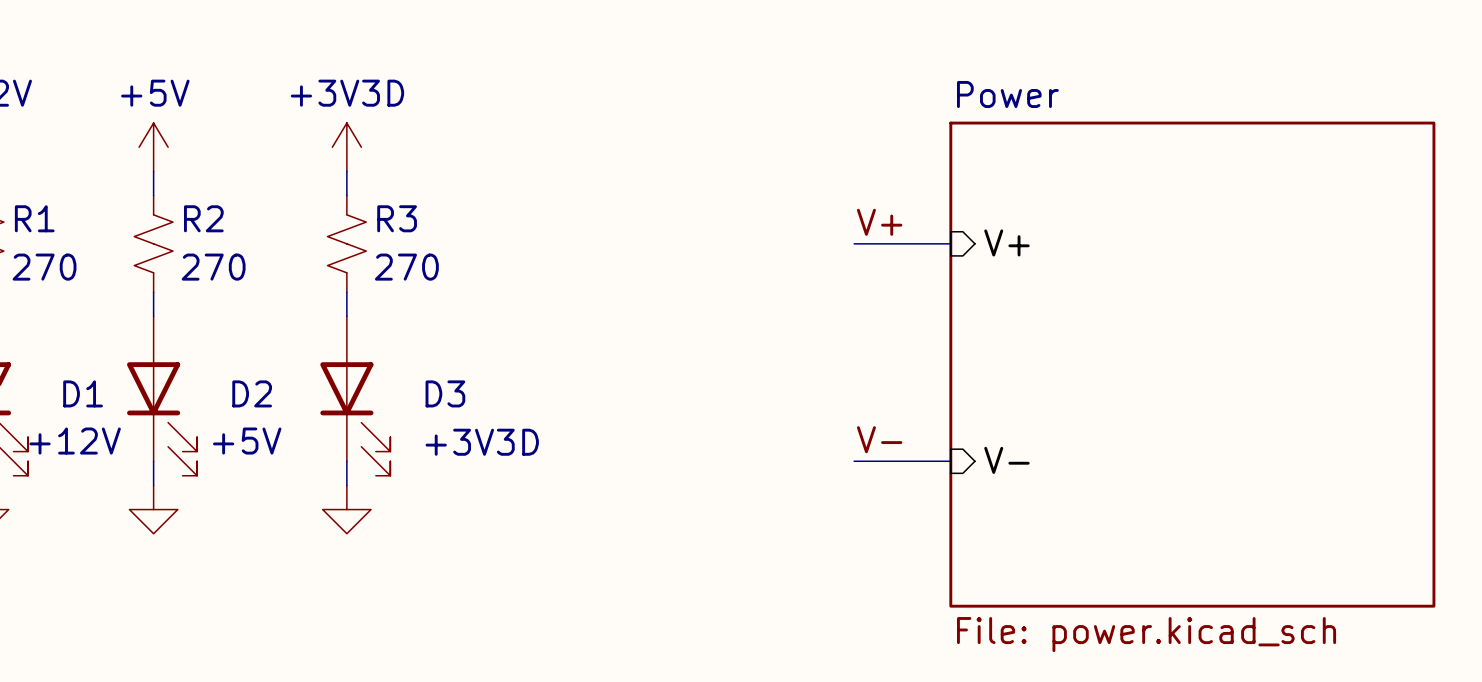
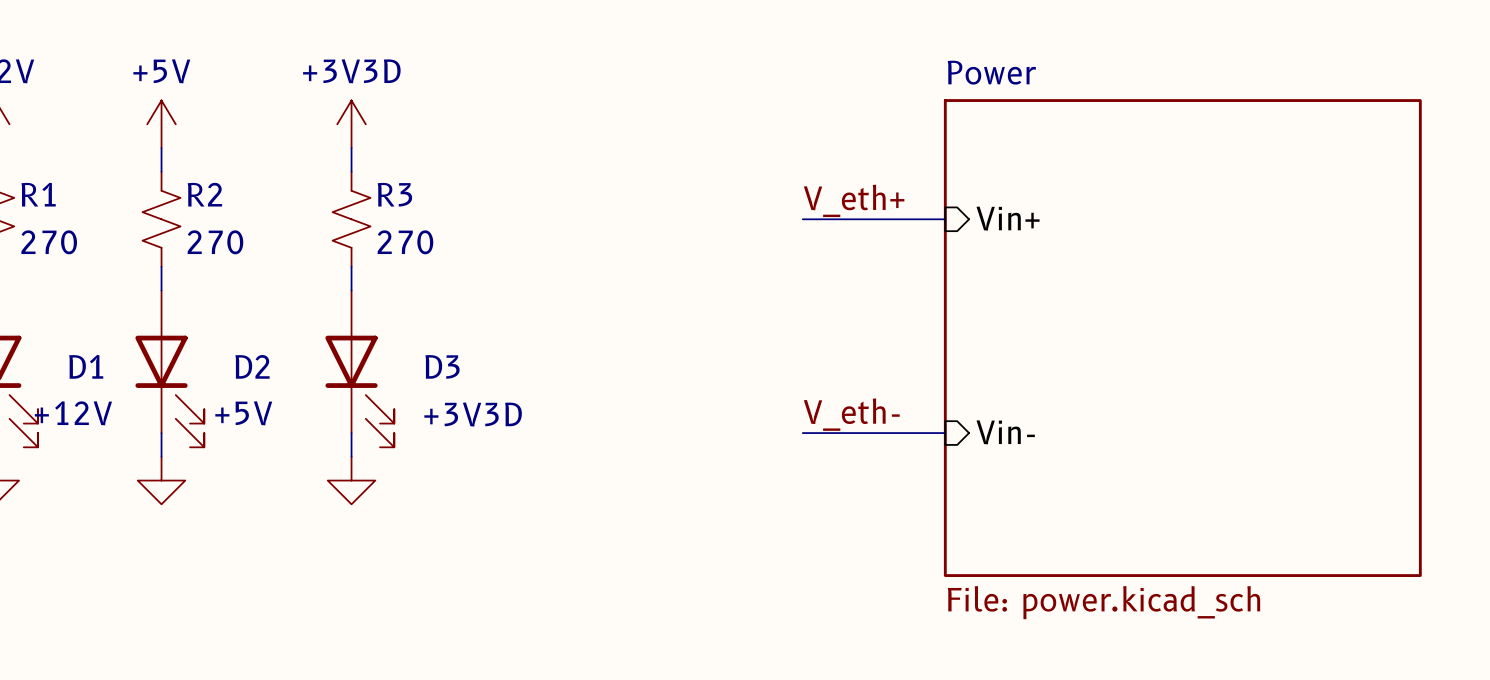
label: V+ (879, 222) -> none
label: none -> V_eth+ (854, 200)
sheet pin: V+ (1006, 242) -> Vin+ (1008, 218)
wire: none -> (802, 219) (850, 219)
label: V- (879, 439) -> none
label: none -> V_eth- (851, 414)
sheet pin: V- (1006, 460) -> Vin- (1005, 432)
wire: none -> (802, 433) (850, 433)

